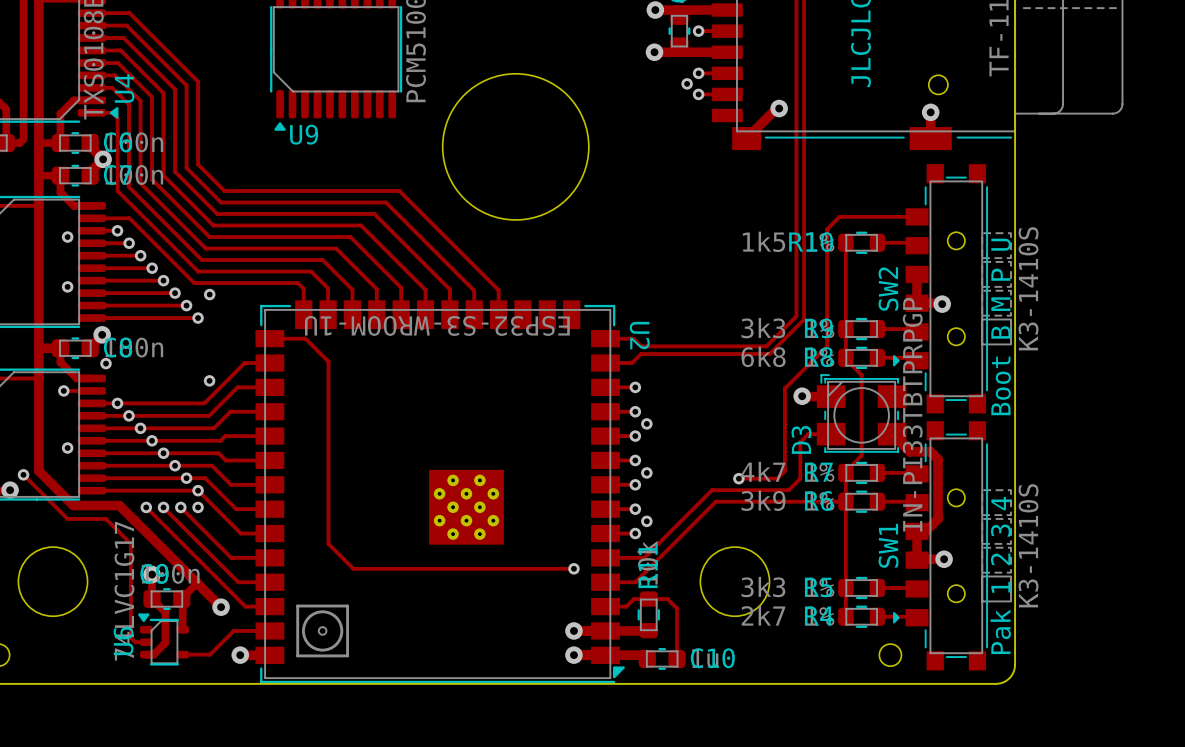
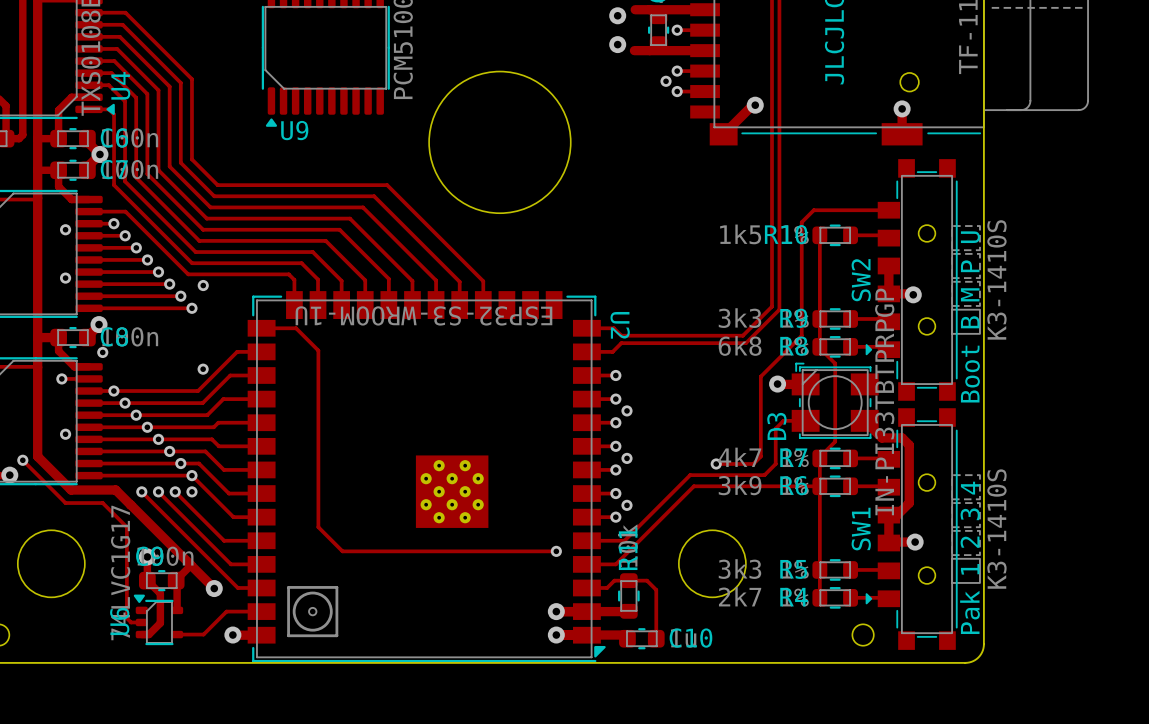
via position: (655, 10) -> (617, 15)
via position: (654, 52) -> (617, 44)

